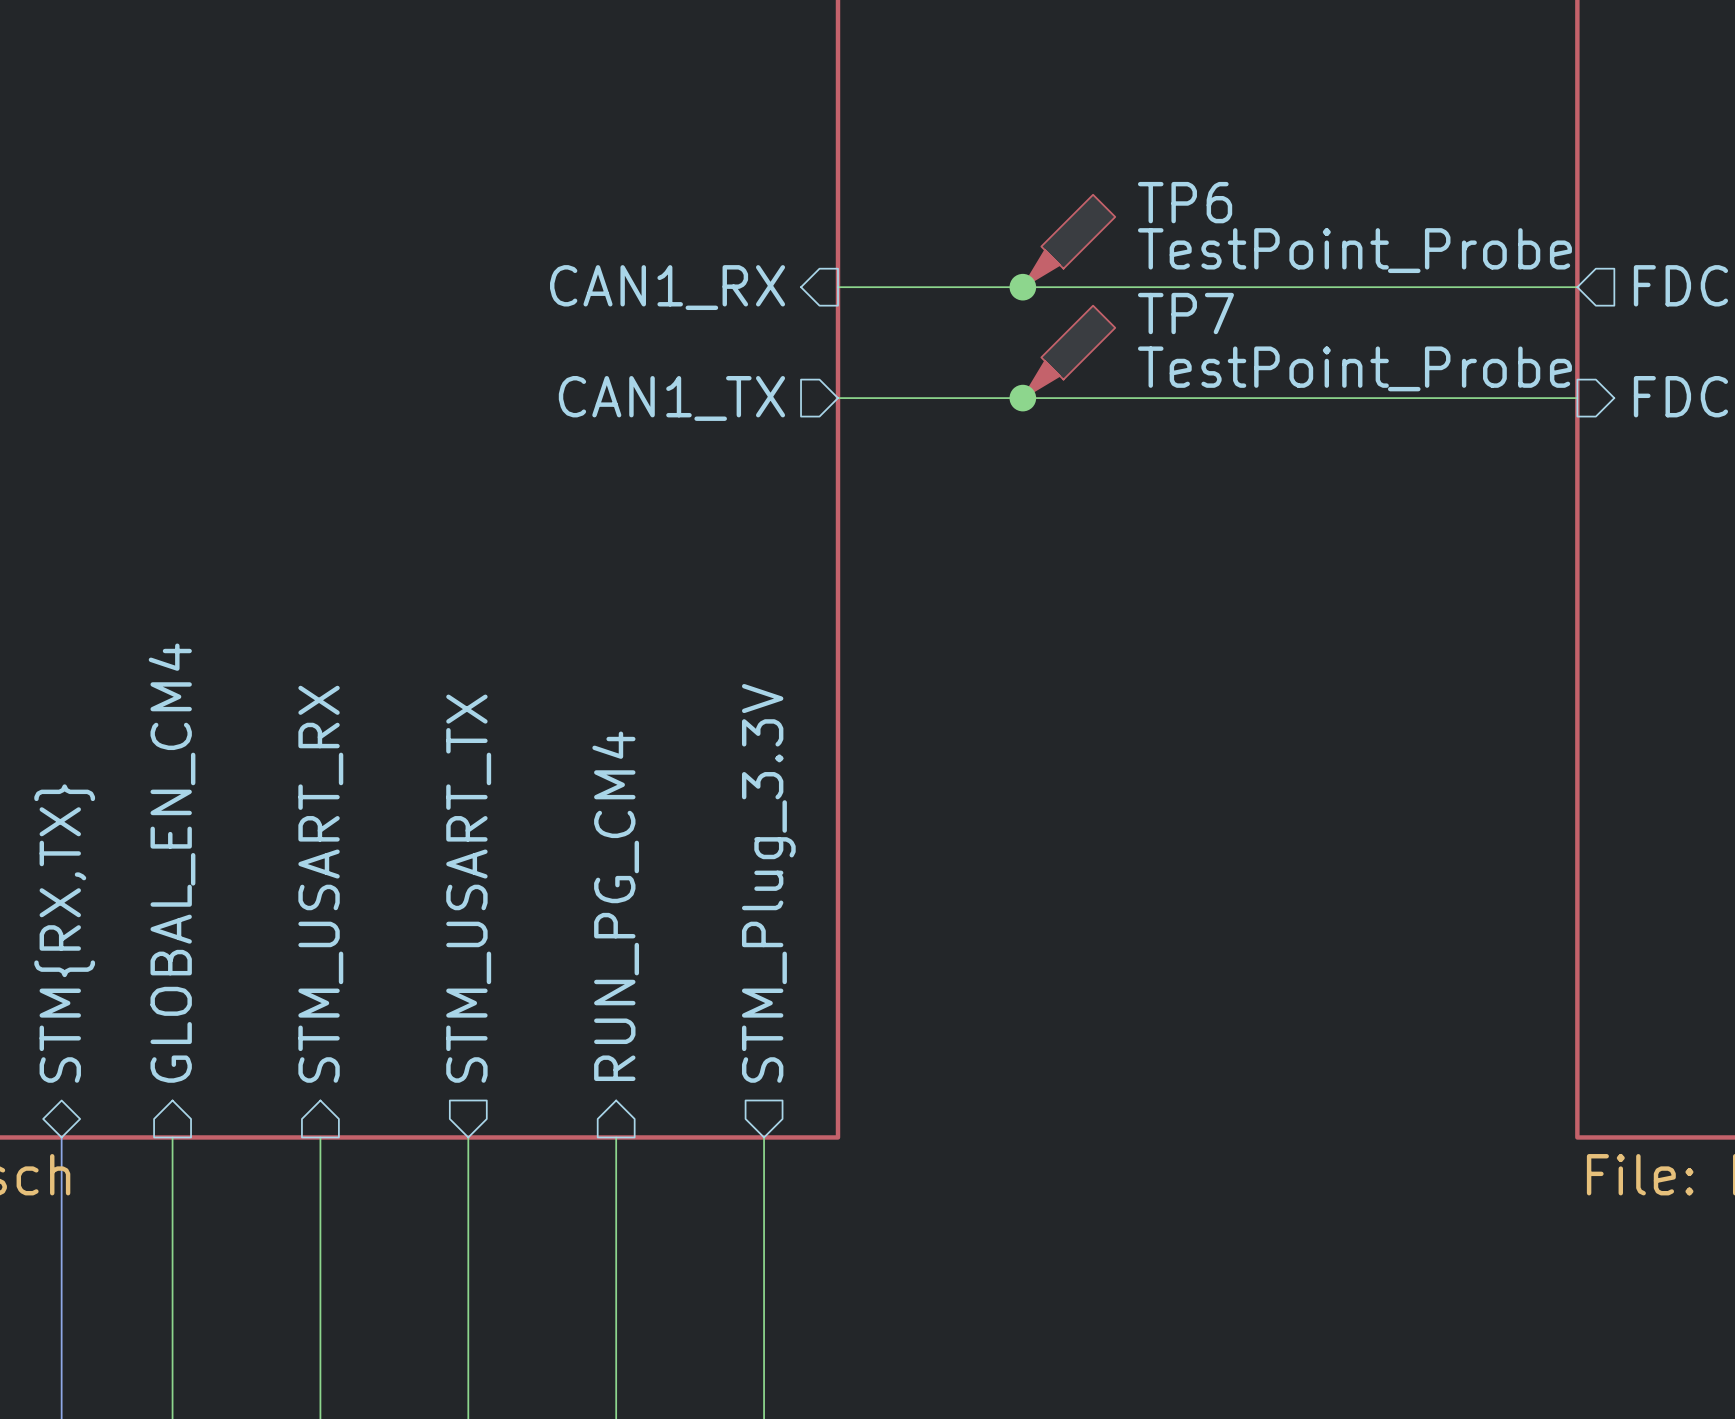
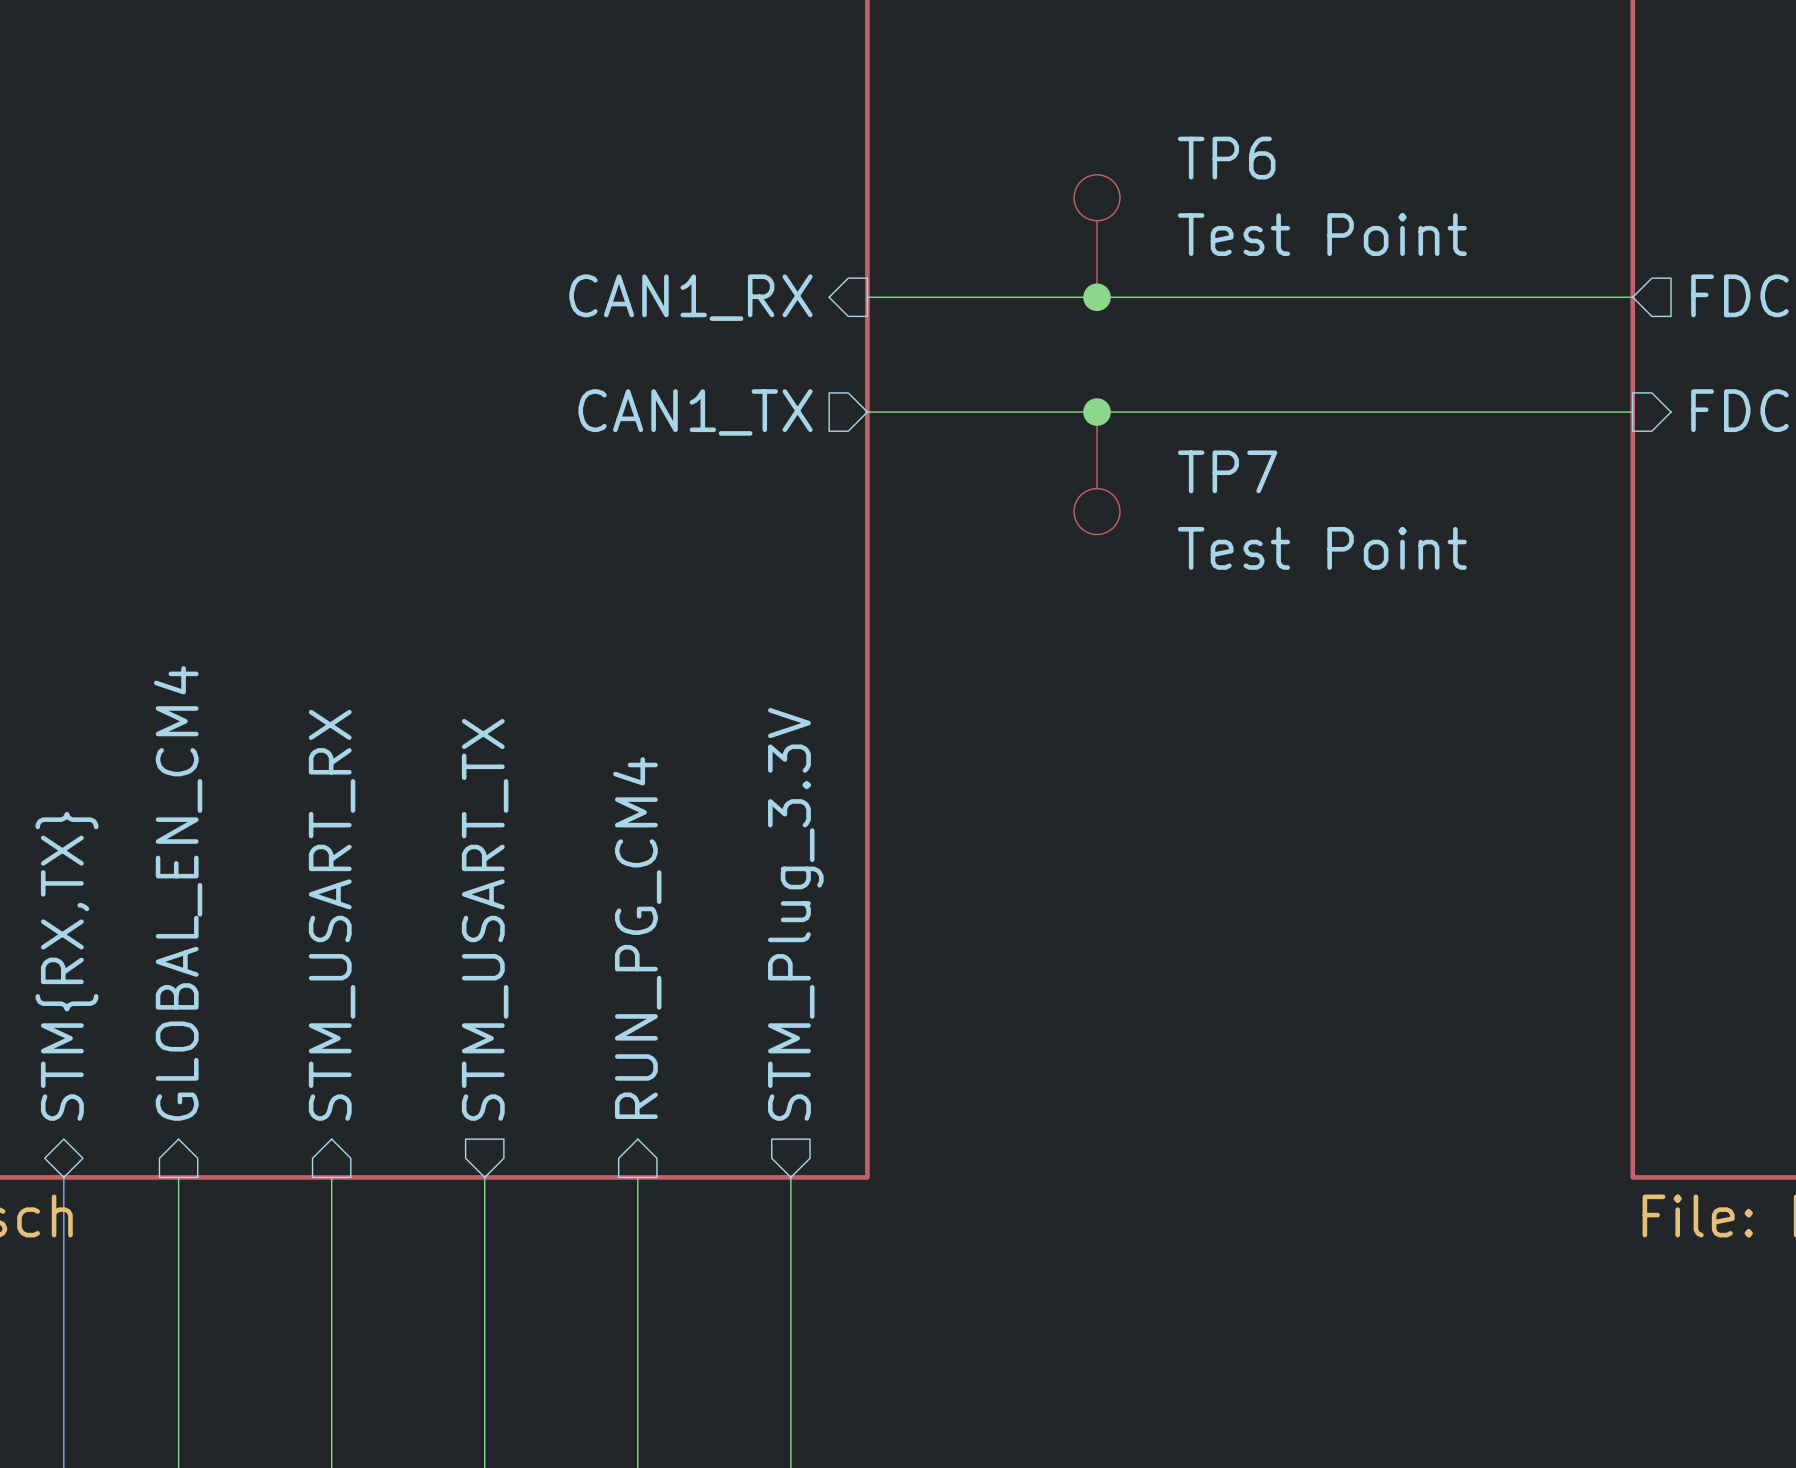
TP6 symbol: [1022, 194, 1116, 288] -> [1074, 174, 1120, 298]
TP6 value: TestPoint_Probe (1354, 250) -> Test Point (1322, 234)
junction position: (1022, 287) -> (1097, 297)
TP7 symbol: [1022, 305, 1116, 399] -> [1074, 412, 1120, 535]
TP7 value: TestPoint_Probe (1354, 368) -> Test Point (1322, 548)
junction position: (1022, 398) -> (1097, 412)

